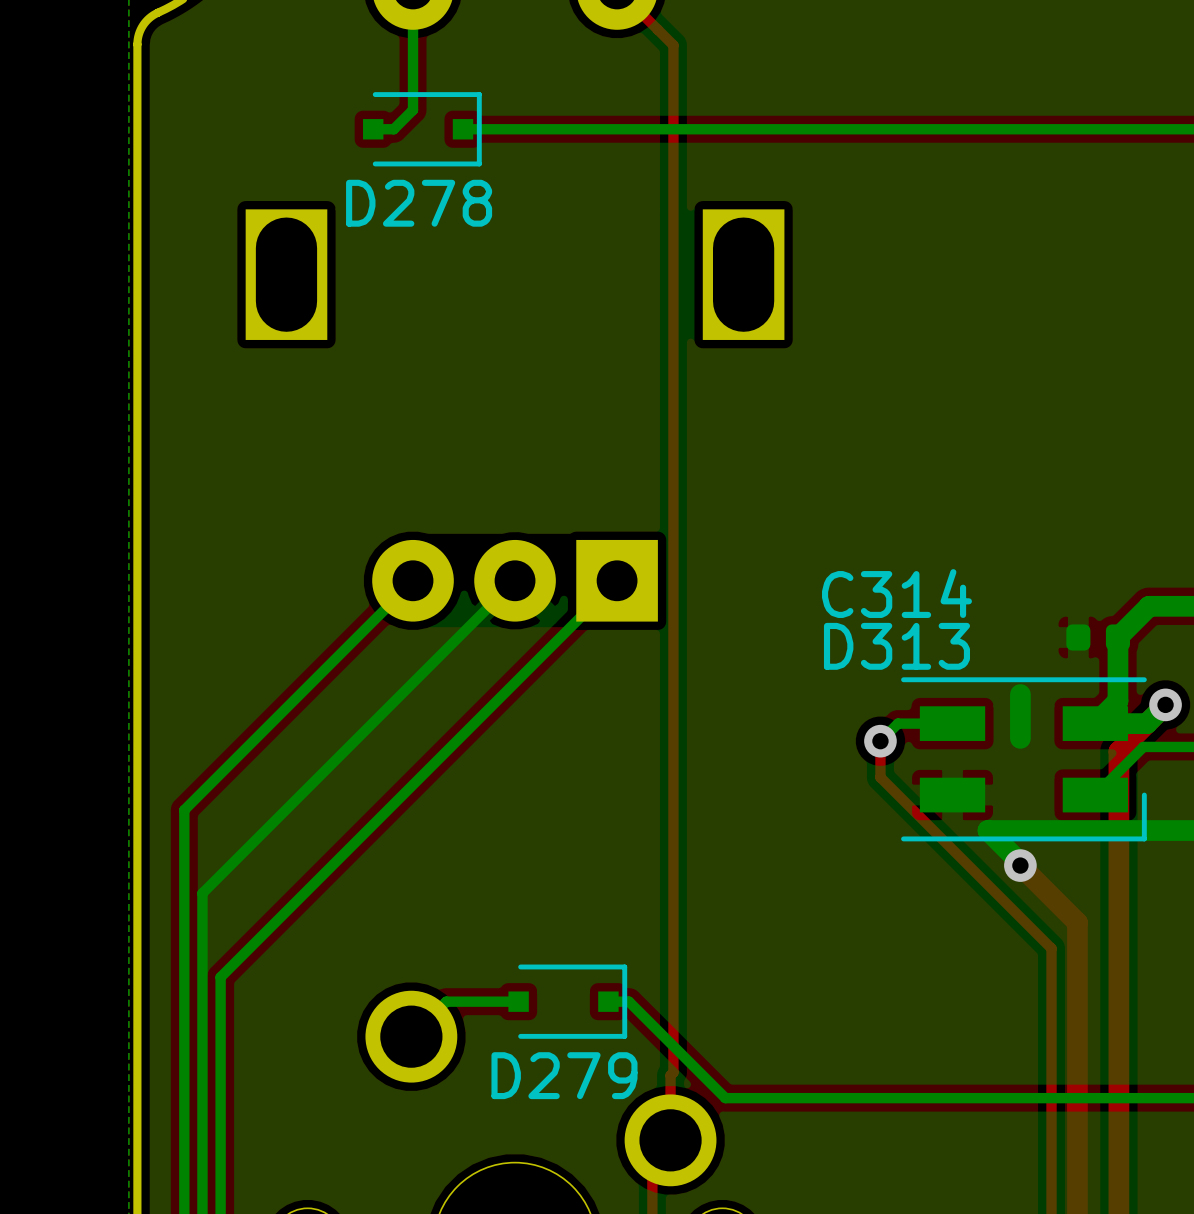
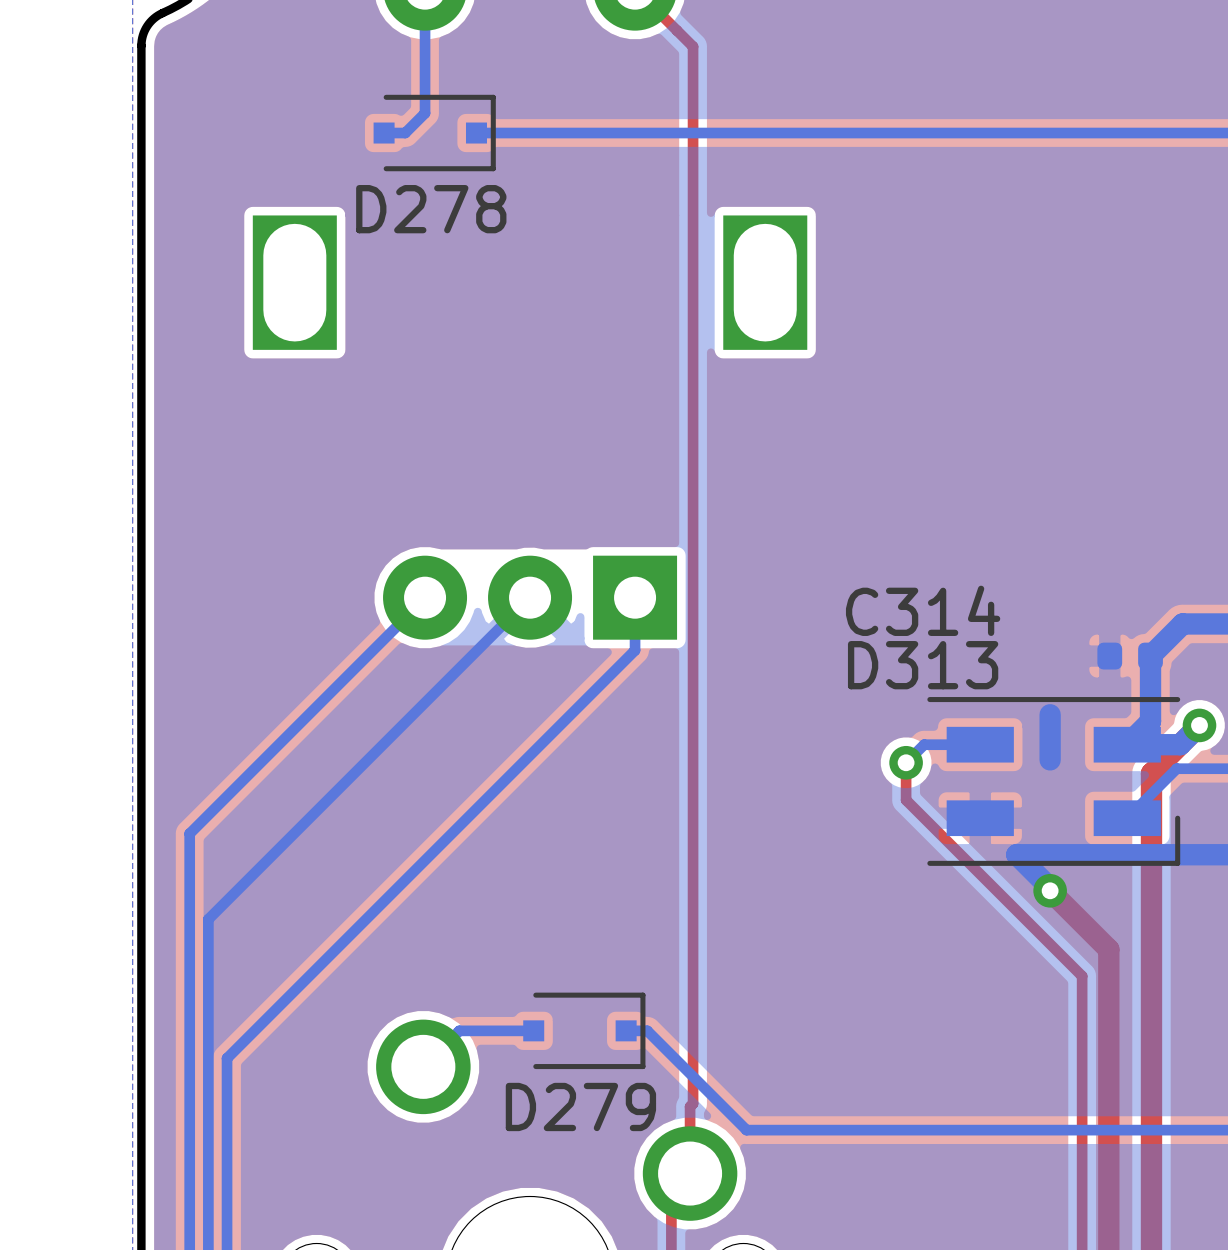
bottom track: (617, 580) (220, 977) (220, 1028) -> (635, 597) (635, 650) (227, 1058)

